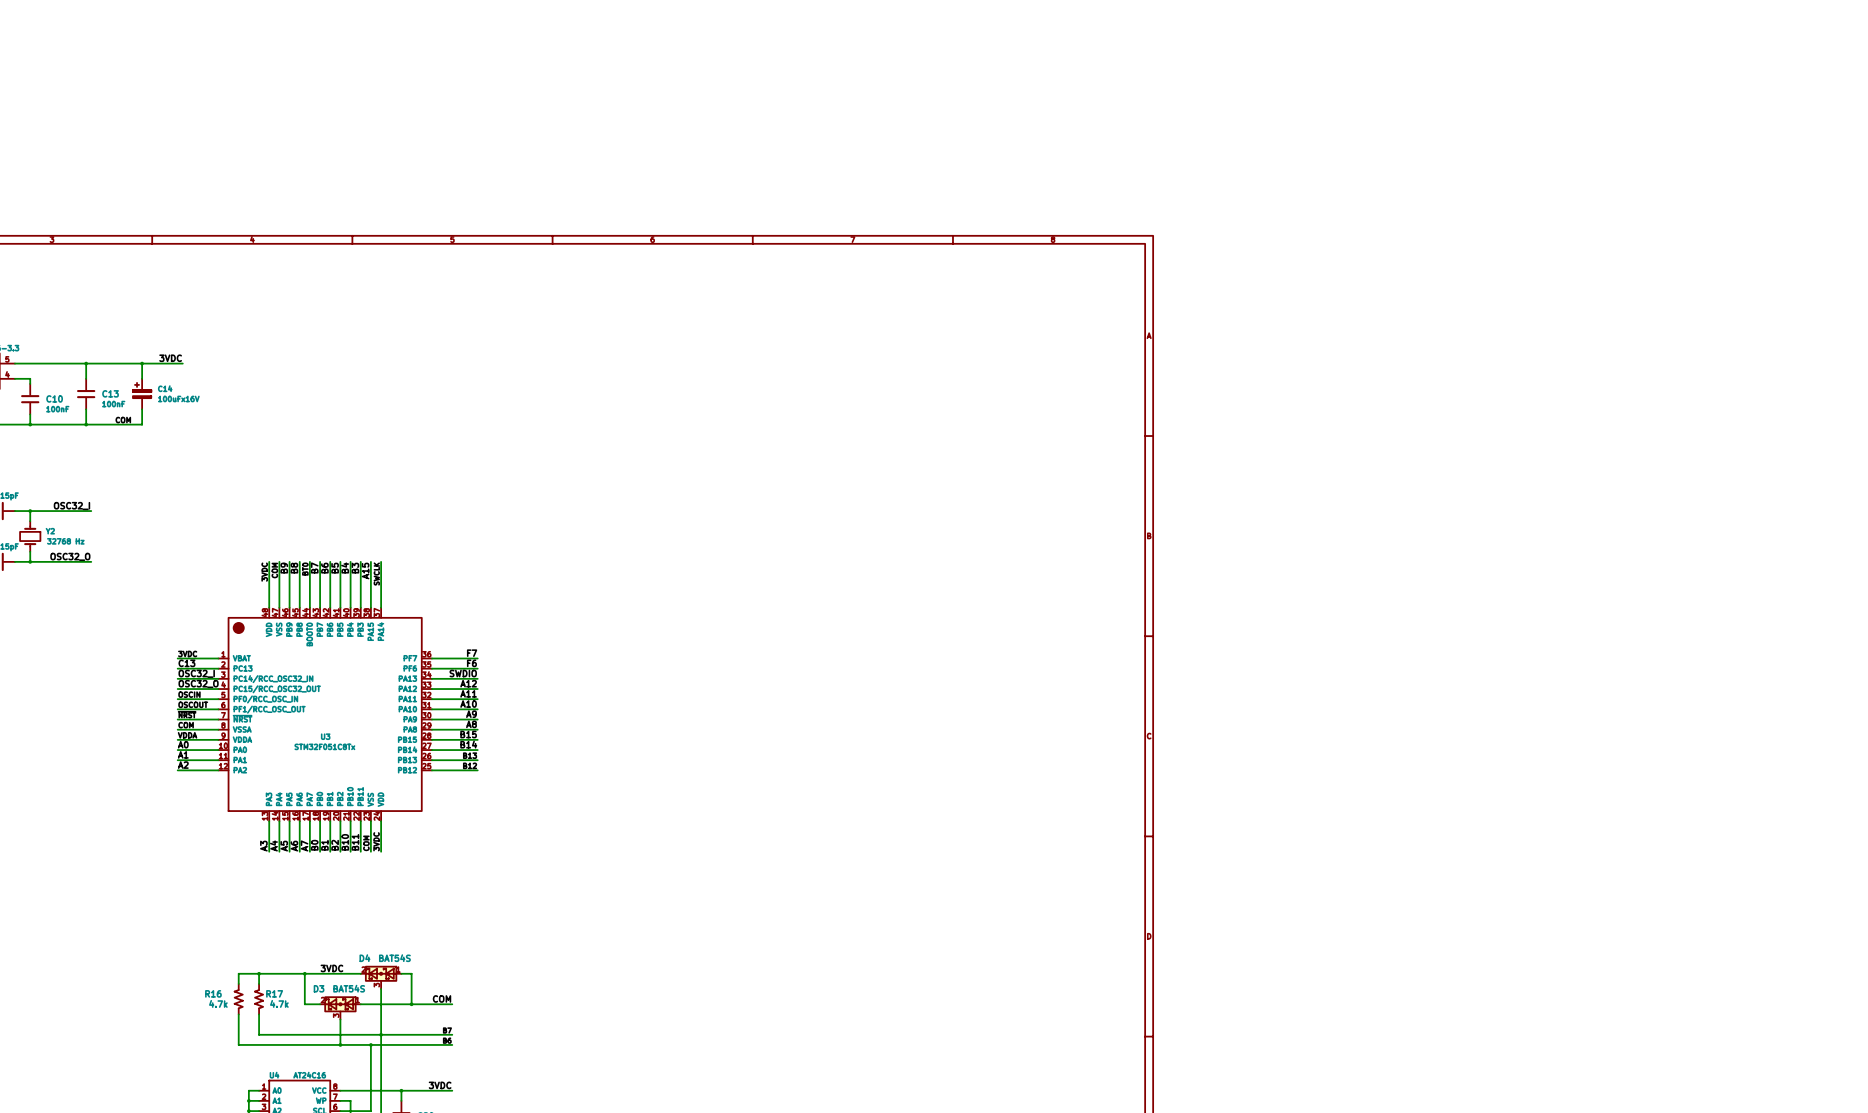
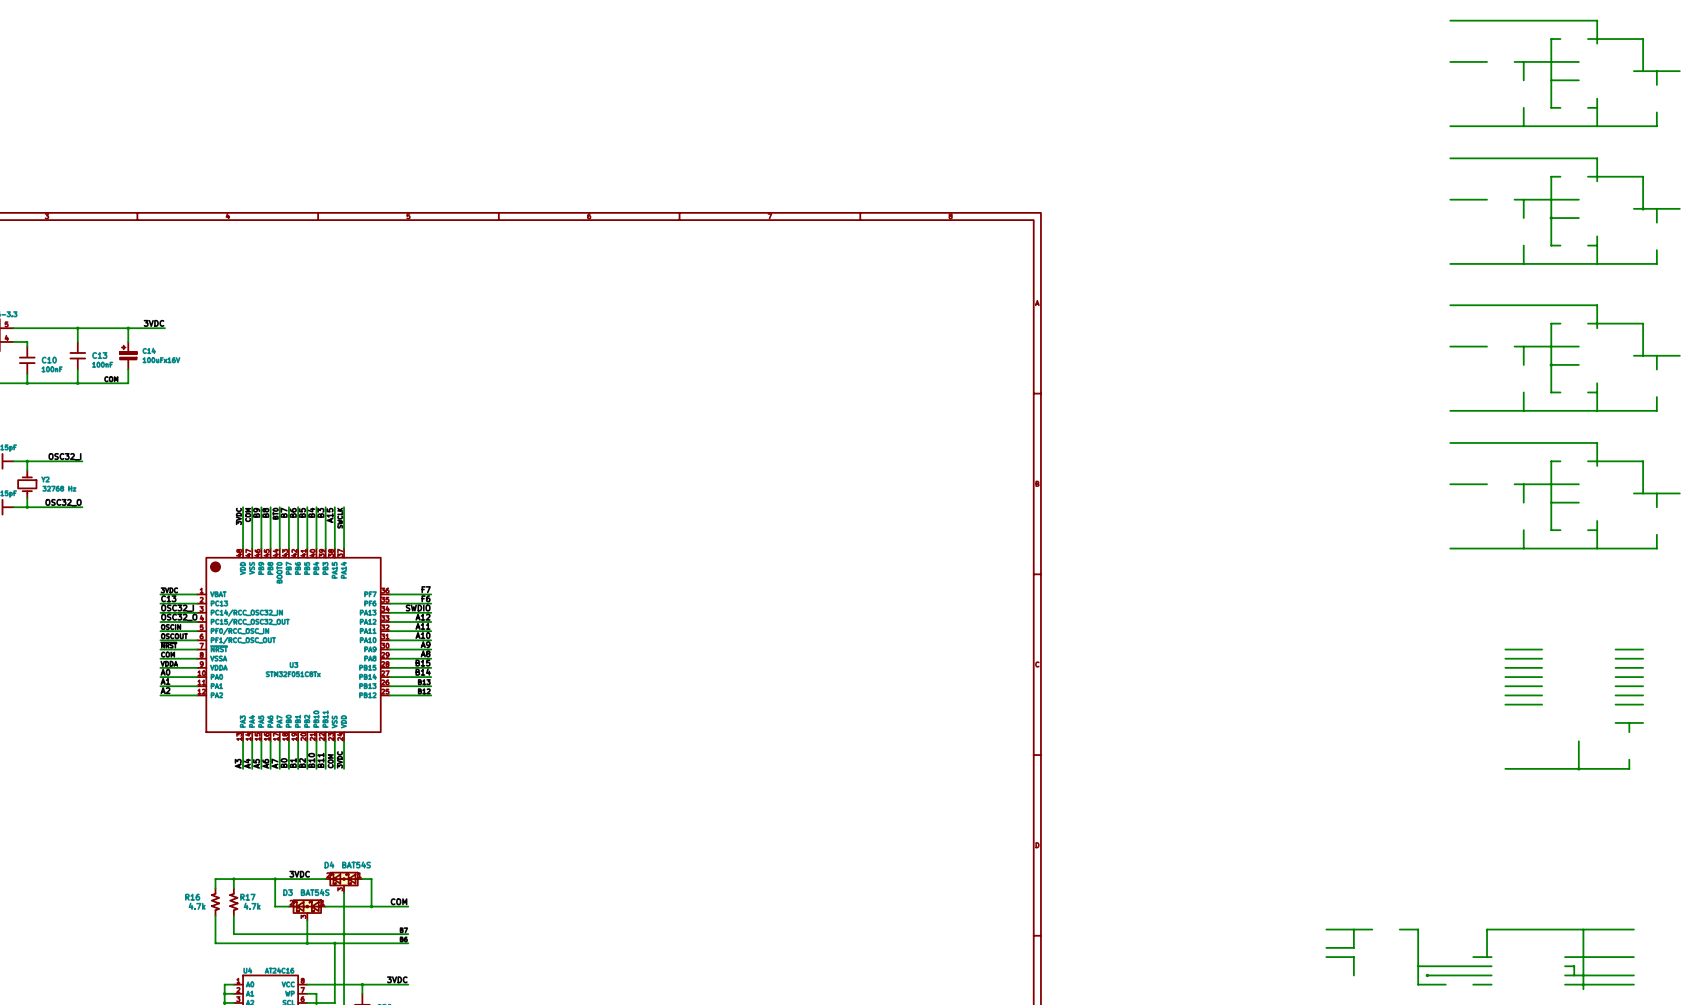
wire: none -> (1450, 20) (1597, 20) (1597, 43)
wire: none -> (1560, 39) (1551, 39) (1551, 107) (1560, 107)
wire: none -> (1588, 39) (1643, 39) (1643, 71)
wire: none -> (1450, 61) (1487, 61)
wire: none -> (1514, 61) (1578, 61)
wire: none -> (1523, 61) (1523, 80)
wire: none -> (1633, 71) (1679, 71)
wire: none -> (1656, 71) (1656, 84)
wire: none -> (1551, 80) (1578, 80)
wire: none -> (1597, 98) (1597, 126)
wire: none -> (1523, 107) (1523, 126)
wire: none -> (1588, 107) (1597, 107)
wire: none -> (1656, 112) (1656, 126) (1450, 126)
wire: none -> (1450, 158) (1597, 158) (1597, 181)
wire: none -> (1560, 176) (1551, 176) (1551, 245) (1560, 245)
wire: none -> (1588, 176) (1643, 176) (1643, 208)
wire: none -> (1450, 199) (1487, 199)
wire: none -> (1514, 199) (1578, 199)
wire: none -> (1523, 199) (1523, 218)
wire: none -> (1633, 208) (1679, 208)
wire: none -> (1656, 208) (1656, 222)
wire: none -> (1551, 218) (1578, 218)
wire: none -> (1597, 236) (1597, 263)
wire: none -> (1523, 245) (1523, 263)
wire: none -> (1588, 245) (1597, 245)
wire: none -> (1656, 250) (1656, 263) (1450, 263)
wire: none -> (1450, 305) (1597, 305) (1597, 328)
wire: none -> (1560, 323) (1551, 323) (1551, 392) (1560, 392)
wire: none -> (1588, 323) (1643, 323) (1643, 355)
wire: none -> (1450, 346) (1487, 346)
wire: none -> (1514, 346) (1578, 346)
wire: none -> (1523, 346) (1523, 364)
wire: none -> (1633, 355) (1679, 355)
wire: none -> (1656, 355) (1656, 369)
wire: none -> (1551, 364) (1578, 364)
wire: none -> (1597, 383) (1597, 410)
wire: none -> (1523, 392) (1523, 410)
wire: none -> (1588, 392) (1597, 392)
wire: none -> (1656, 397) (1656, 410) (1450, 410)
wire: none -> (1450, 442) (1597, 442) (1597, 465)
wire: none -> (1560, 461) (1551, 461) (1551, 530) (1560, 530)
wire: none -> (1588, 461) (1643, 461) (1643, 493)
wire: none -> (1450, 484) (1487, 484)
wire: none -> (1514, 484) (1578, 484)
wire: none -> (1523, 484) (1523, 502)
wire: none -> (1633, 493) (1679, 493)
wire: none -> (1656, 493) (1656, 507)
wire: none -> (1551, 502) (1578, 502)
wire: none -> (1597, 521) (1597, 548)
wire: none -> (1523, 530) (1523, 548)
wire: none -> (1588, 530) (1597, 530)
wire: none -> (1656, 534) (1656, 548) (1450, 548)
wire: none -> (1505, 649) (1542, 649)
wire: none -> (1615, 649) (1643, 649)
wire: none -> (1505, 658) (1542, 658)
wire: none -> (1615, 658) (1643, 658)
wire: none -> (1505, 667) (1542, 667)
wire: none -> (1615, 667) (1643, 667)
wire: none -> (1505, 677) (1542, 677)
wire: none -> (1615, 677) (1643, 677)
wire: none -> (1505, 686) (1542, 686)
wire: none -> (1615, 686) (1643, 686)
wire: none -> (1505, 695) (1542, 695)
wire: none -> (1615, 695) (1643, 695)
wire: none -> (1505, 704) (1542, 704)
wire: none -> (1615, 704) (1643, 704)
wire: none -> (1615, 722) (1643, 722)
wire: none -> (1629, 722) (1629, 732)
wire: none -> (1578, 741) (1578, 768)
wire: none -> (1629, 759) (1629, 768) (1505, 768)
wire: none -> (1326, 929) (1372, 929)
wire: none -> (1353, 929) (1353, 947) (1326, 947)
wire: none -> (1399, 929) (1418, 929) (1418, 984) (1445, 984)
wire: none -> (1583, 929) (1583, 989)
wire: none -> (1633, 929) (1487, 929) (1487, 957)
wire: none -> (1326, 957) (1353, 957) (1353, 975)
wire: none -> (1473, 957) (1491, 957)
wire: none -> (1565, 957) (1633, 957)
wire: none -> (1418, 966) (1491, 966)
wire: none -> (1565, 966) (1574, 966) (1574, 975)
wire: none -> (1427, 975) (1491, 975)
junction: none -> (1427, 975)
wire: none -> (1565, 975) (1633, 975)
wire: none -> (1473, 984) (1491, 984)
wire: none -> (1565, 984) (1633, 984)

